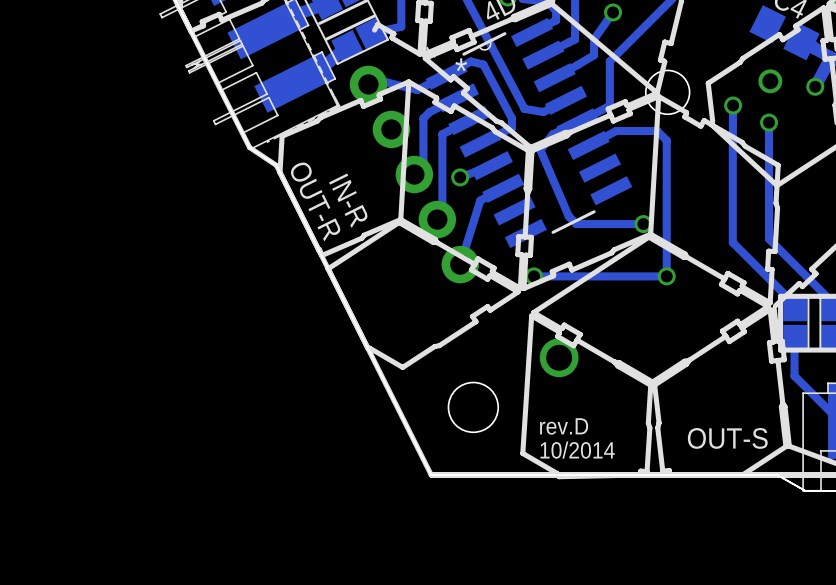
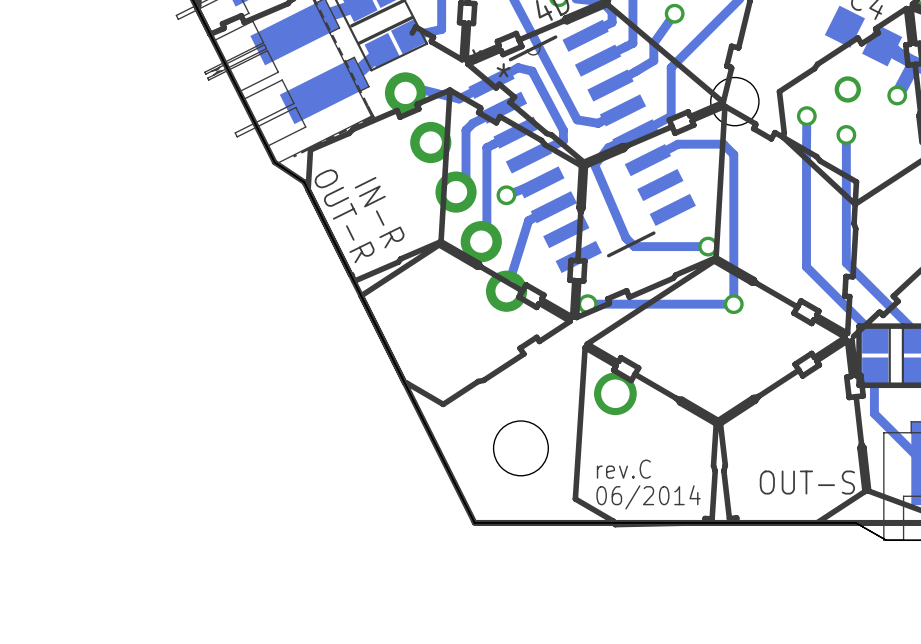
text: rev.D (564, 426) -> rev.C (623, 469)
text: 10/2014 (577, 450) -> 06/2014 (648, 497)

